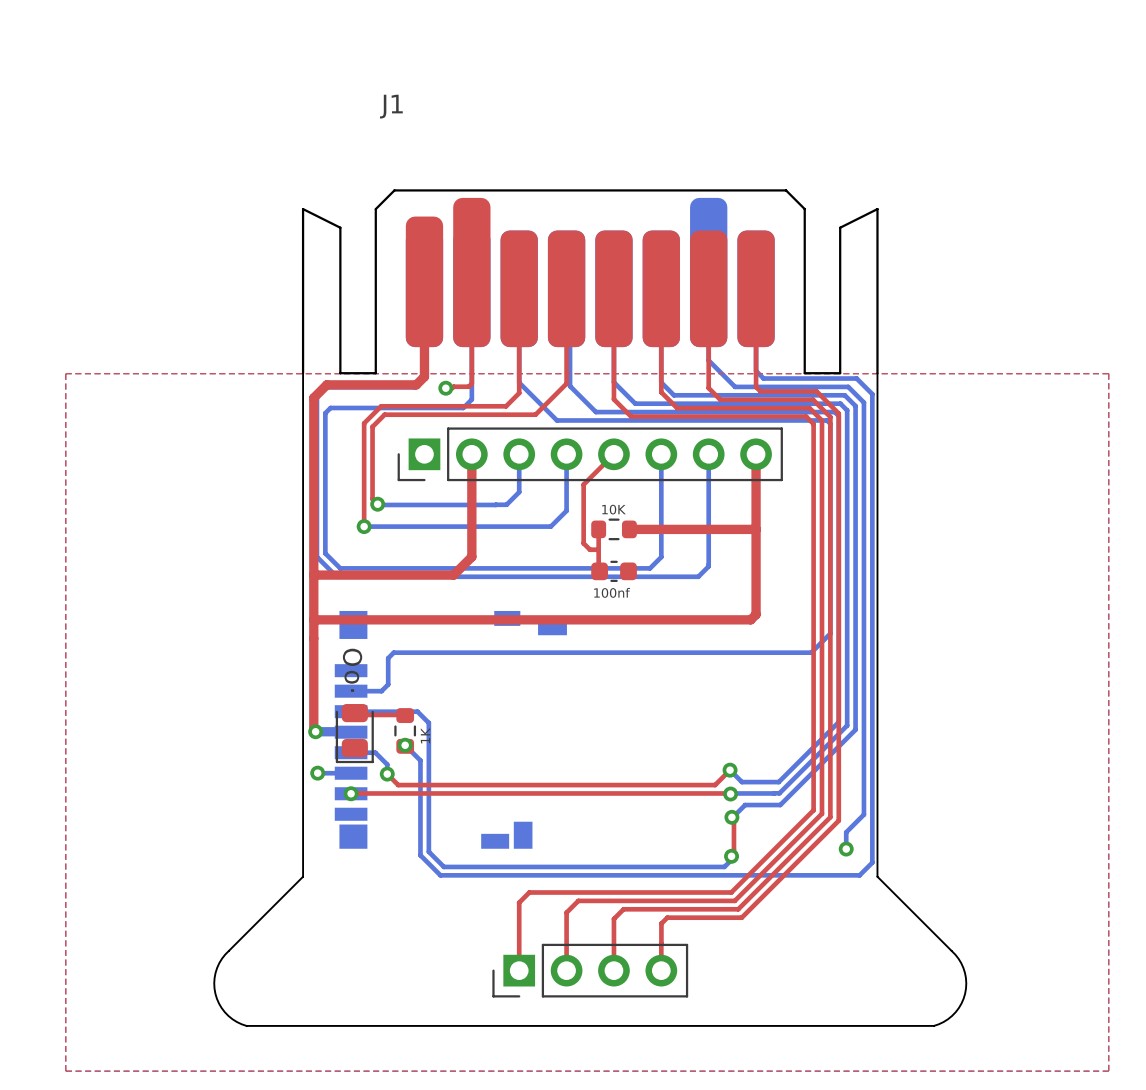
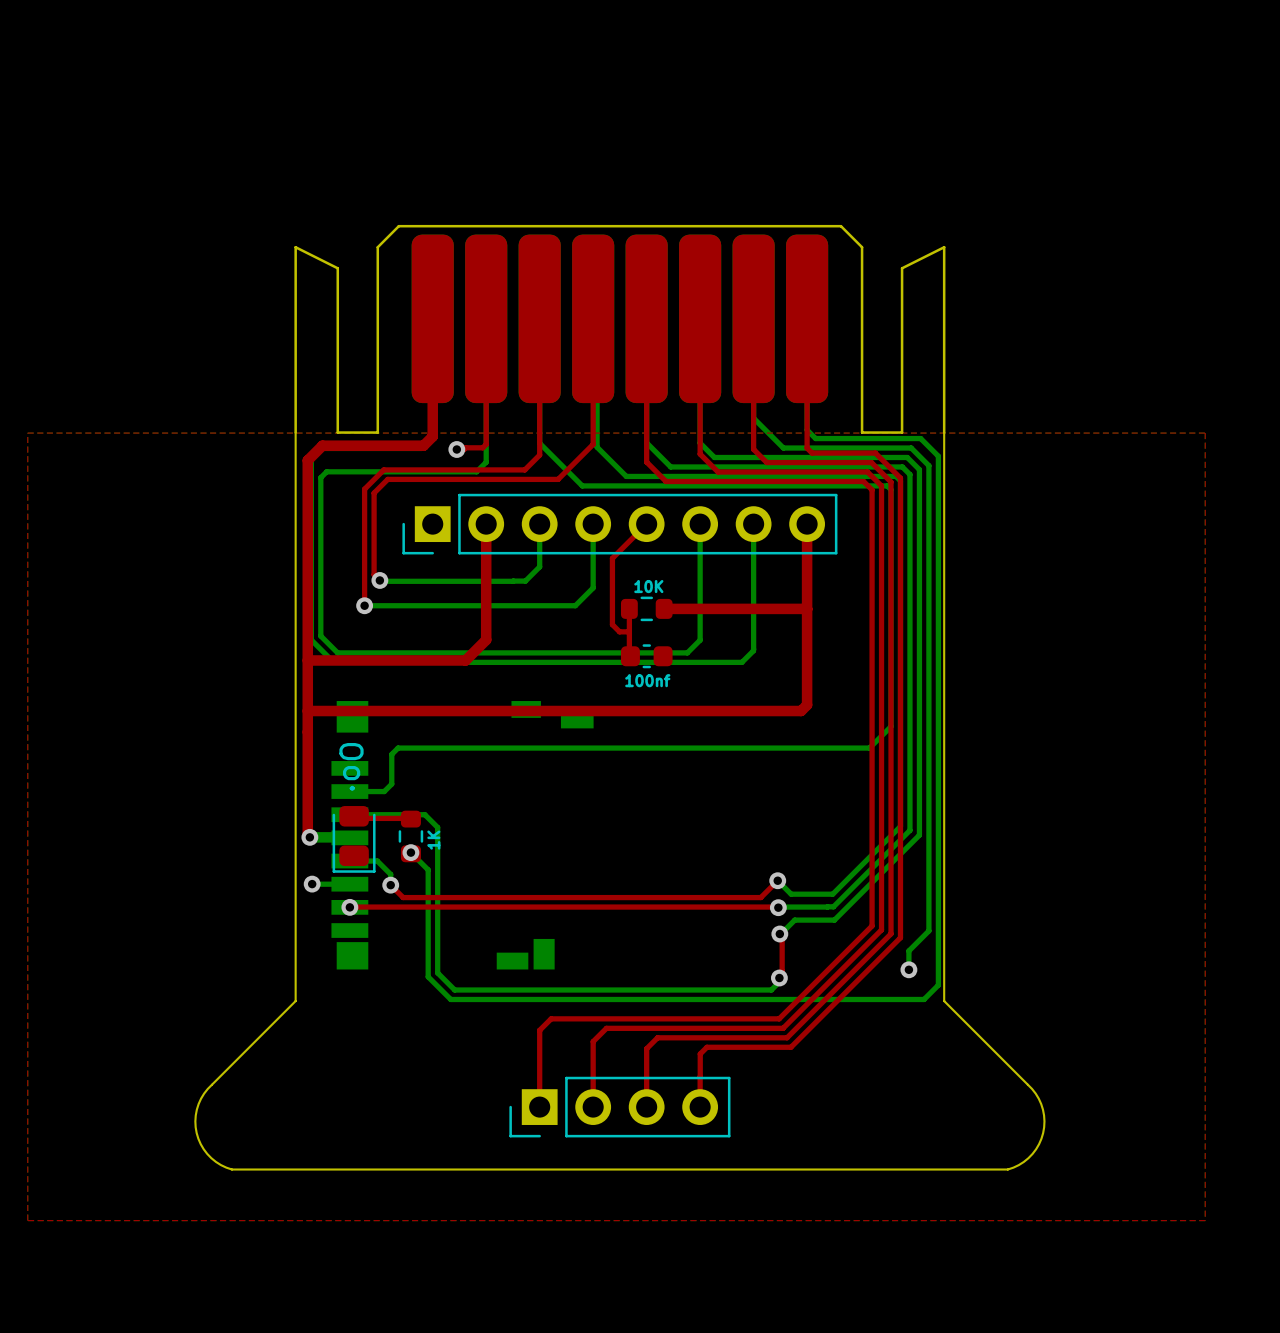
J1: (590, 281) -> none
part: none -> (619, 329)

